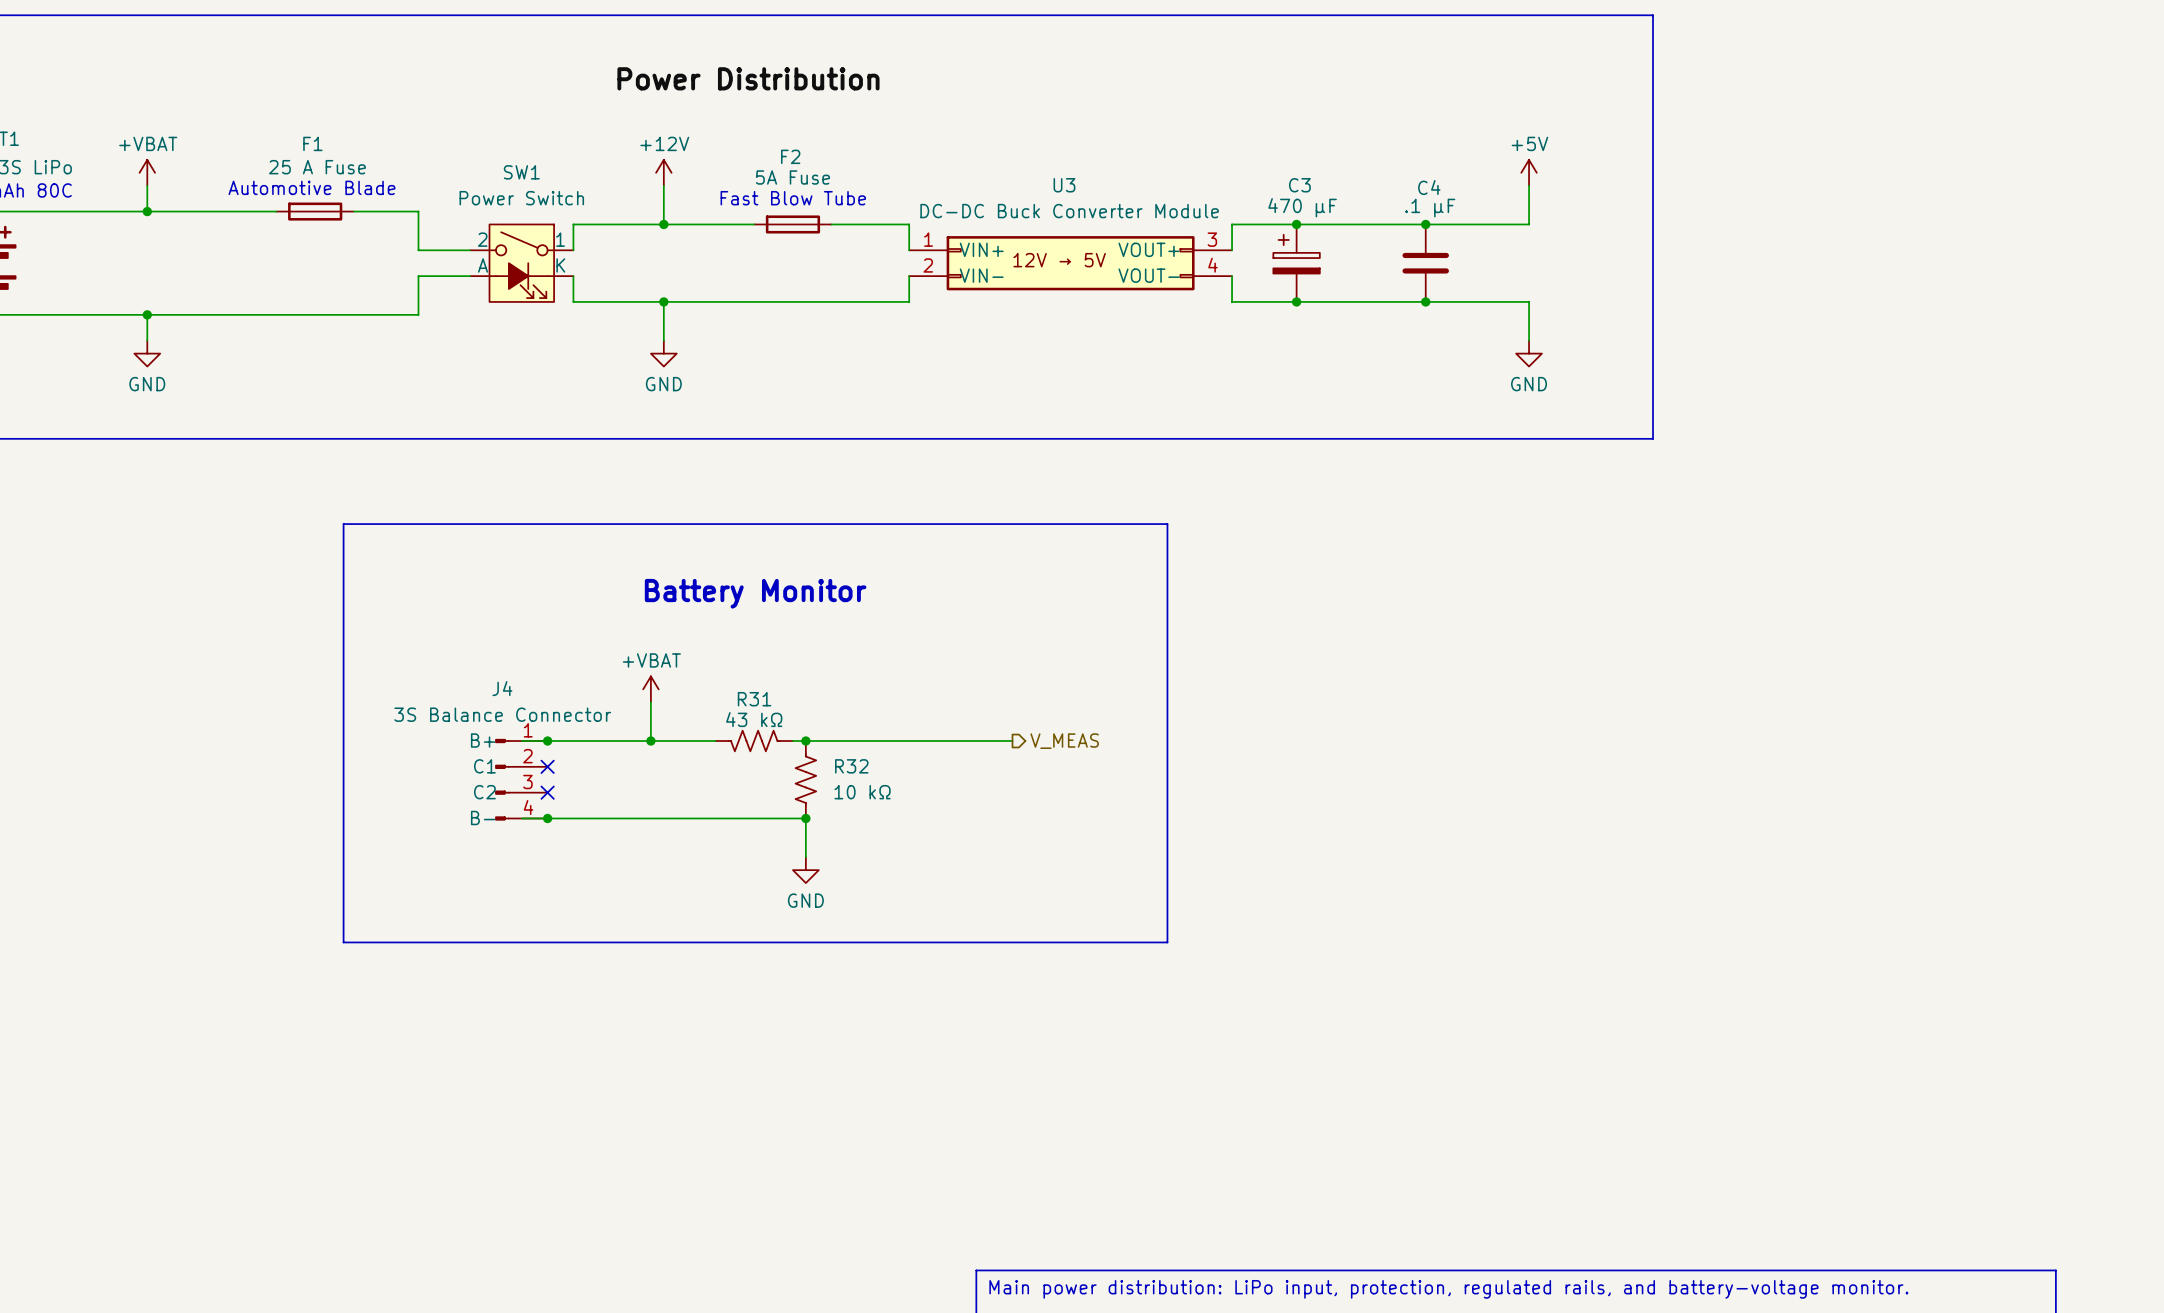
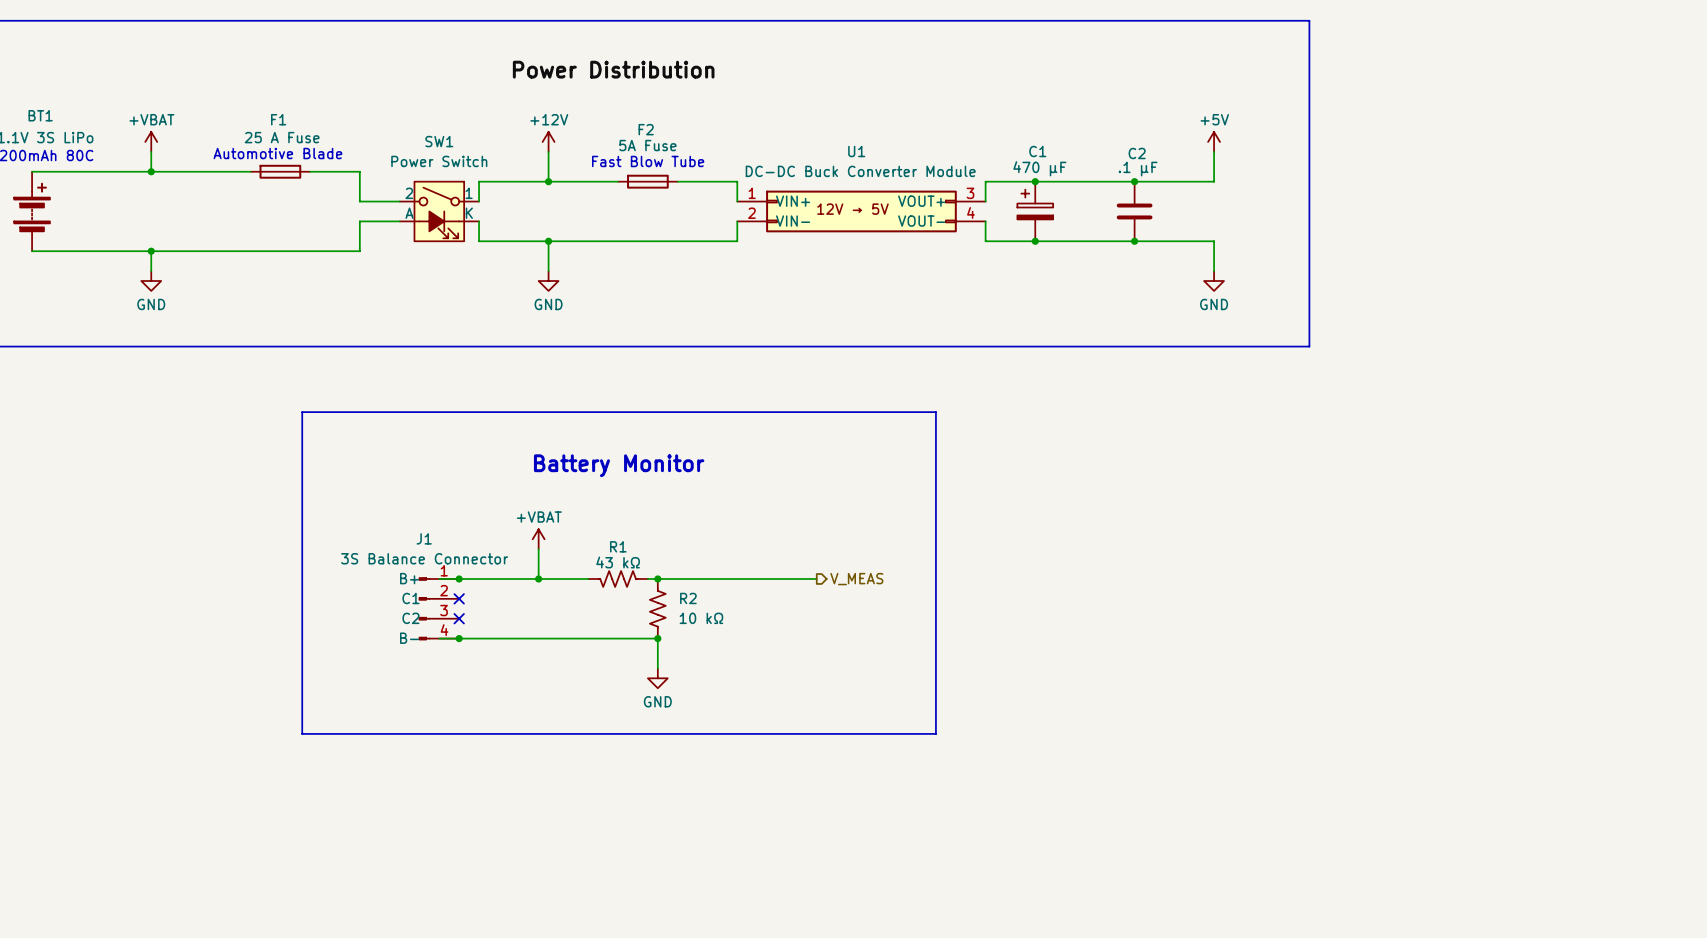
U3 name: U3 (1064, 185) -> U1 (856, 151)
C3 name: C3 (1299, 185) -> C1 (1037, 151)
C4 name: C4 (1429, 187) -> C2 (1137, 153)
J4 name: J4 (502, 688) -> J1 (424, 538)
R31 name: R31 (754, 699) -> R1 (618, 546)
R32 name: R32 (851, 766) -> R2 (688, 598)

